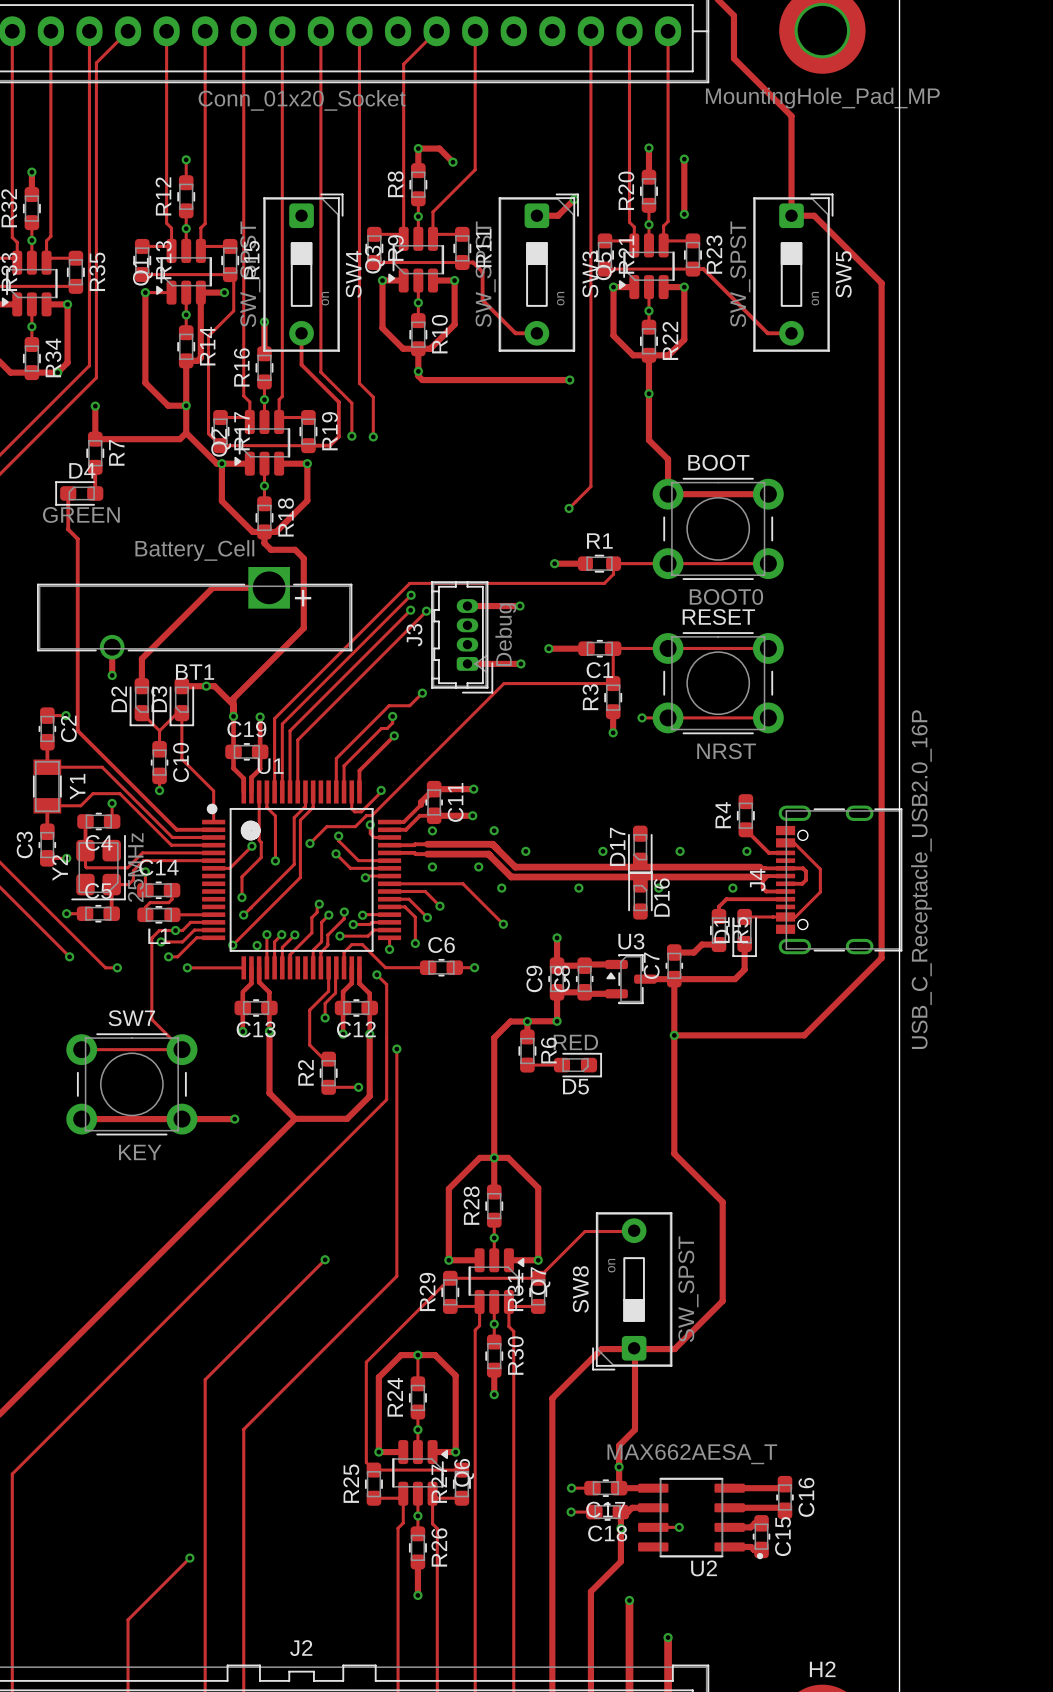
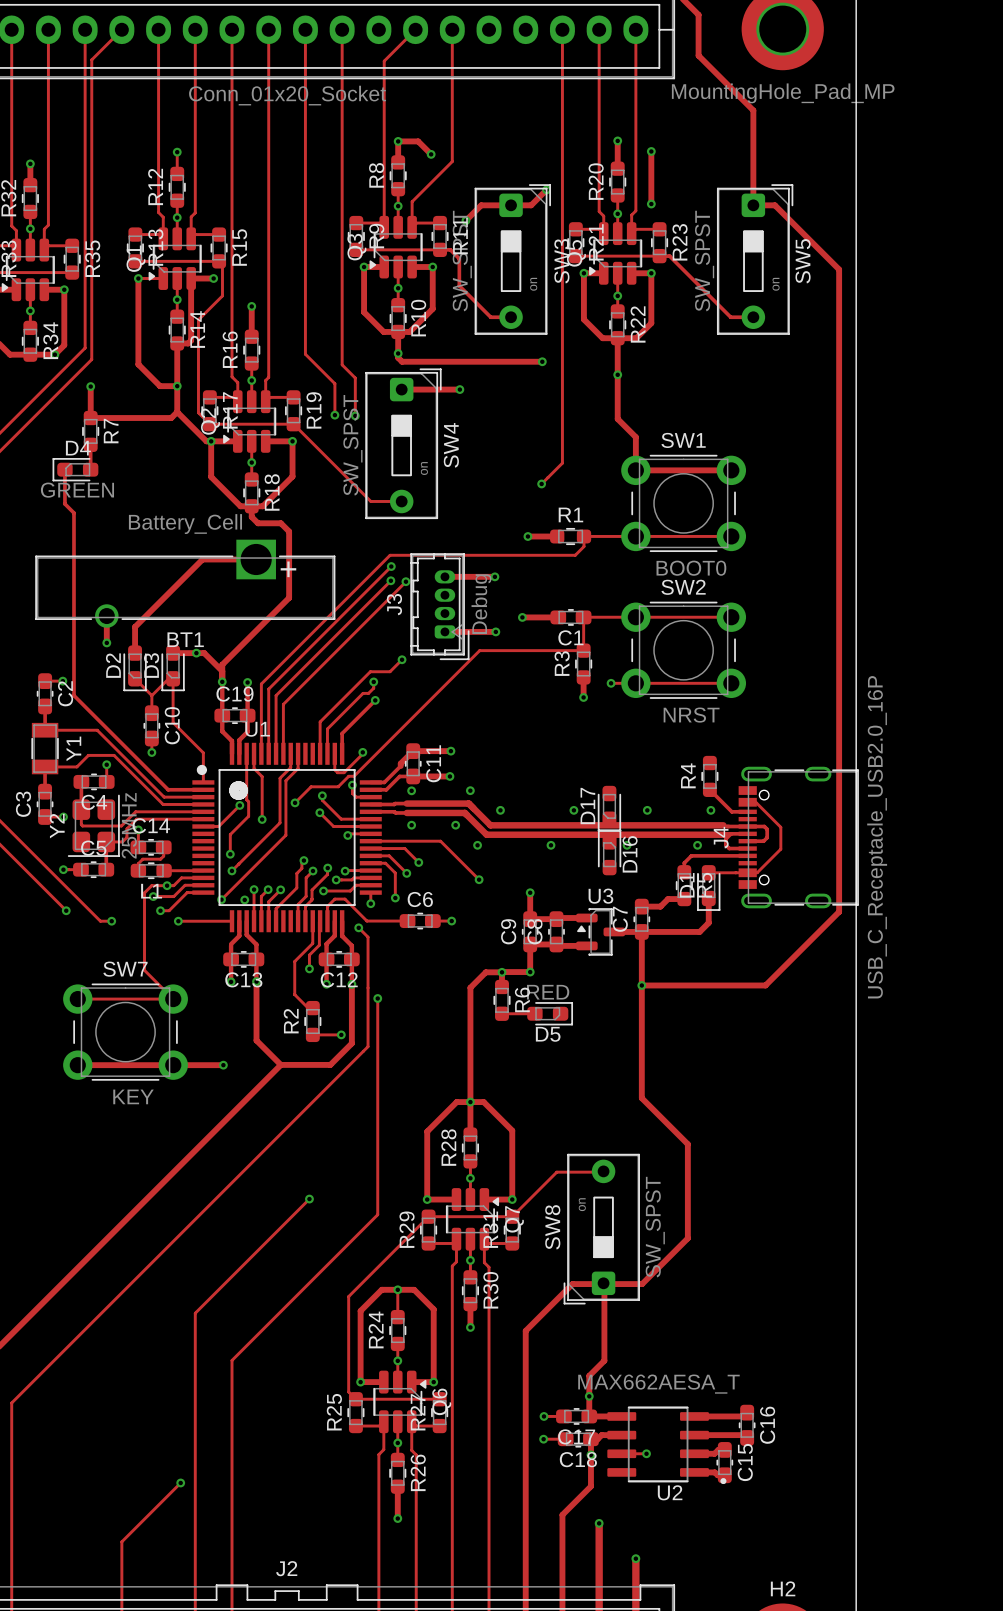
track: none -> (511, 205) (481, 205) (465, 220)
via: none -> (465, 220)
SW4 position: (303, 272) -> (403, 443)
track: (301, 333) (301, 364) (338, 402) (338, 436) (329, 445) (308, 445) -> (401, 501) (370, 501) (293, 424)
track: none -> (401, 389) (459, 389)
via: none -> (459, 389)
BOOT name: BOOT (718, 462) -> SW1 (683, 440)
RESET name: RESET (718, 617) -> SW2 (683, 587)

